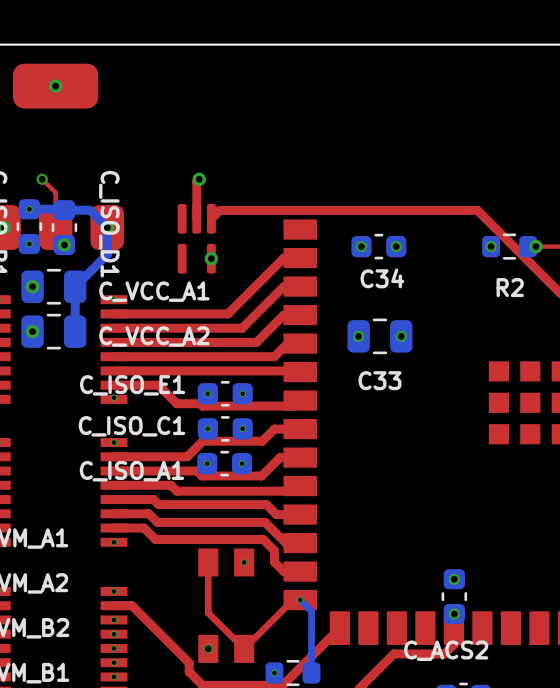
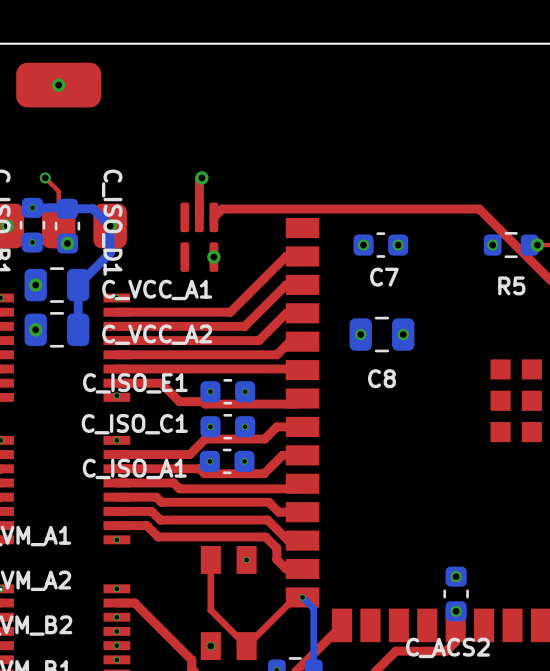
C34 name: C34 (382, 278) -> C7 (384, 277)
R2 name: R2 (510, 287) -> R5 (511, 285)
C33 name: C33 (379, 380) -> C8 (381, 378)

